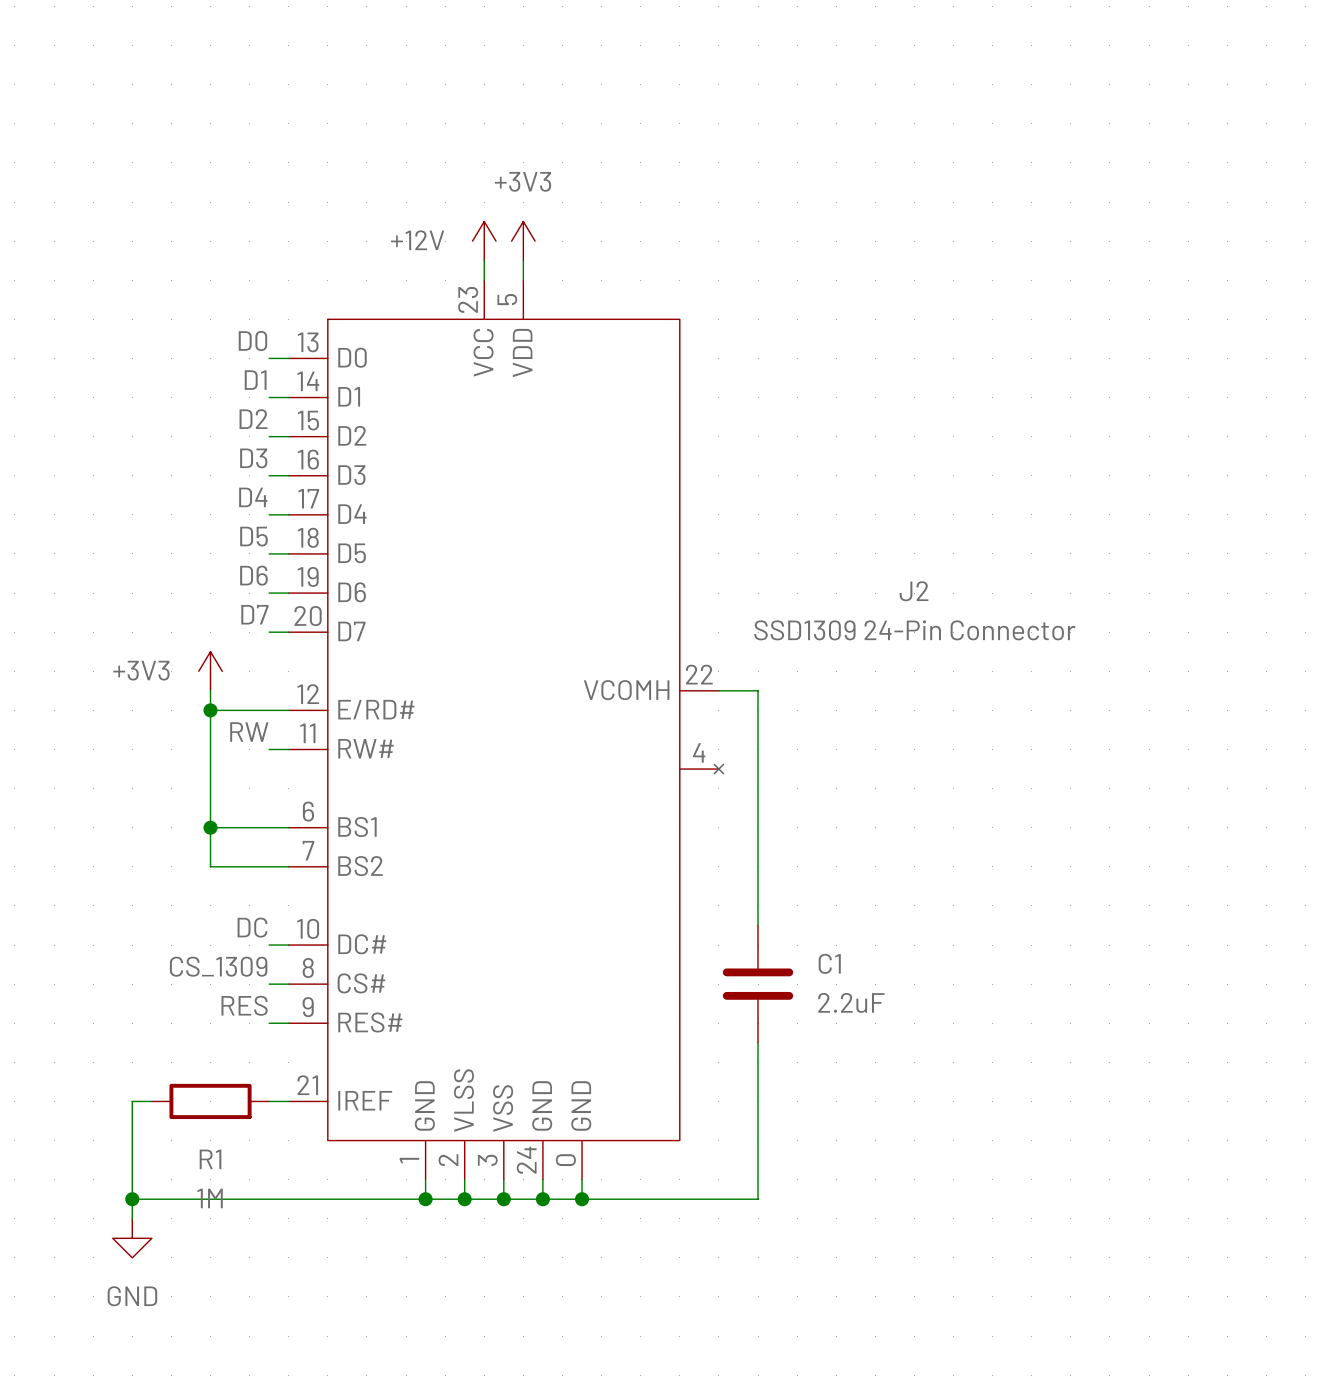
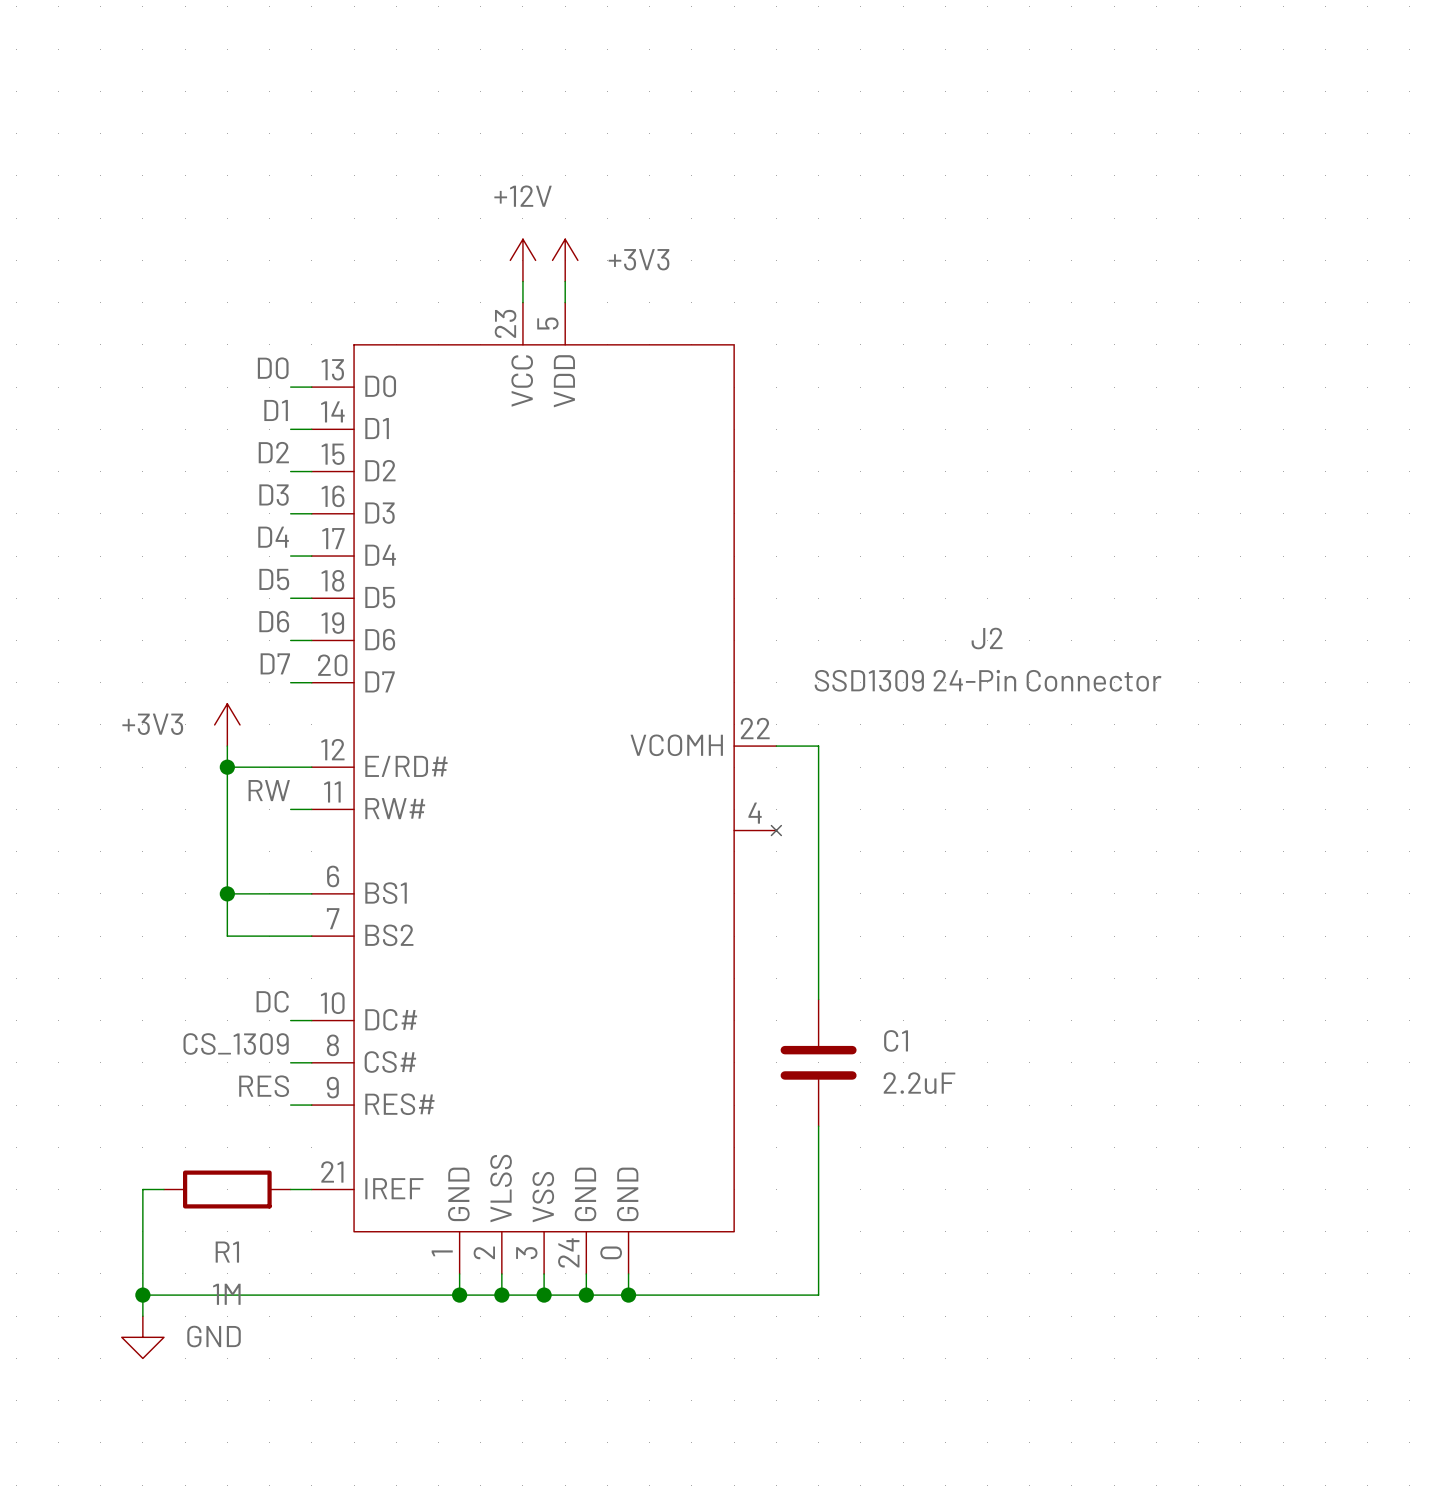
power symbol text position: +3V3 (523, 181) -> +3V3 (639, 259)
power symbol text position: +12V (417, 240) -> +12V (523, 196)
power symbol text position: GND (132, 1296) -> GND (214, 1336)

